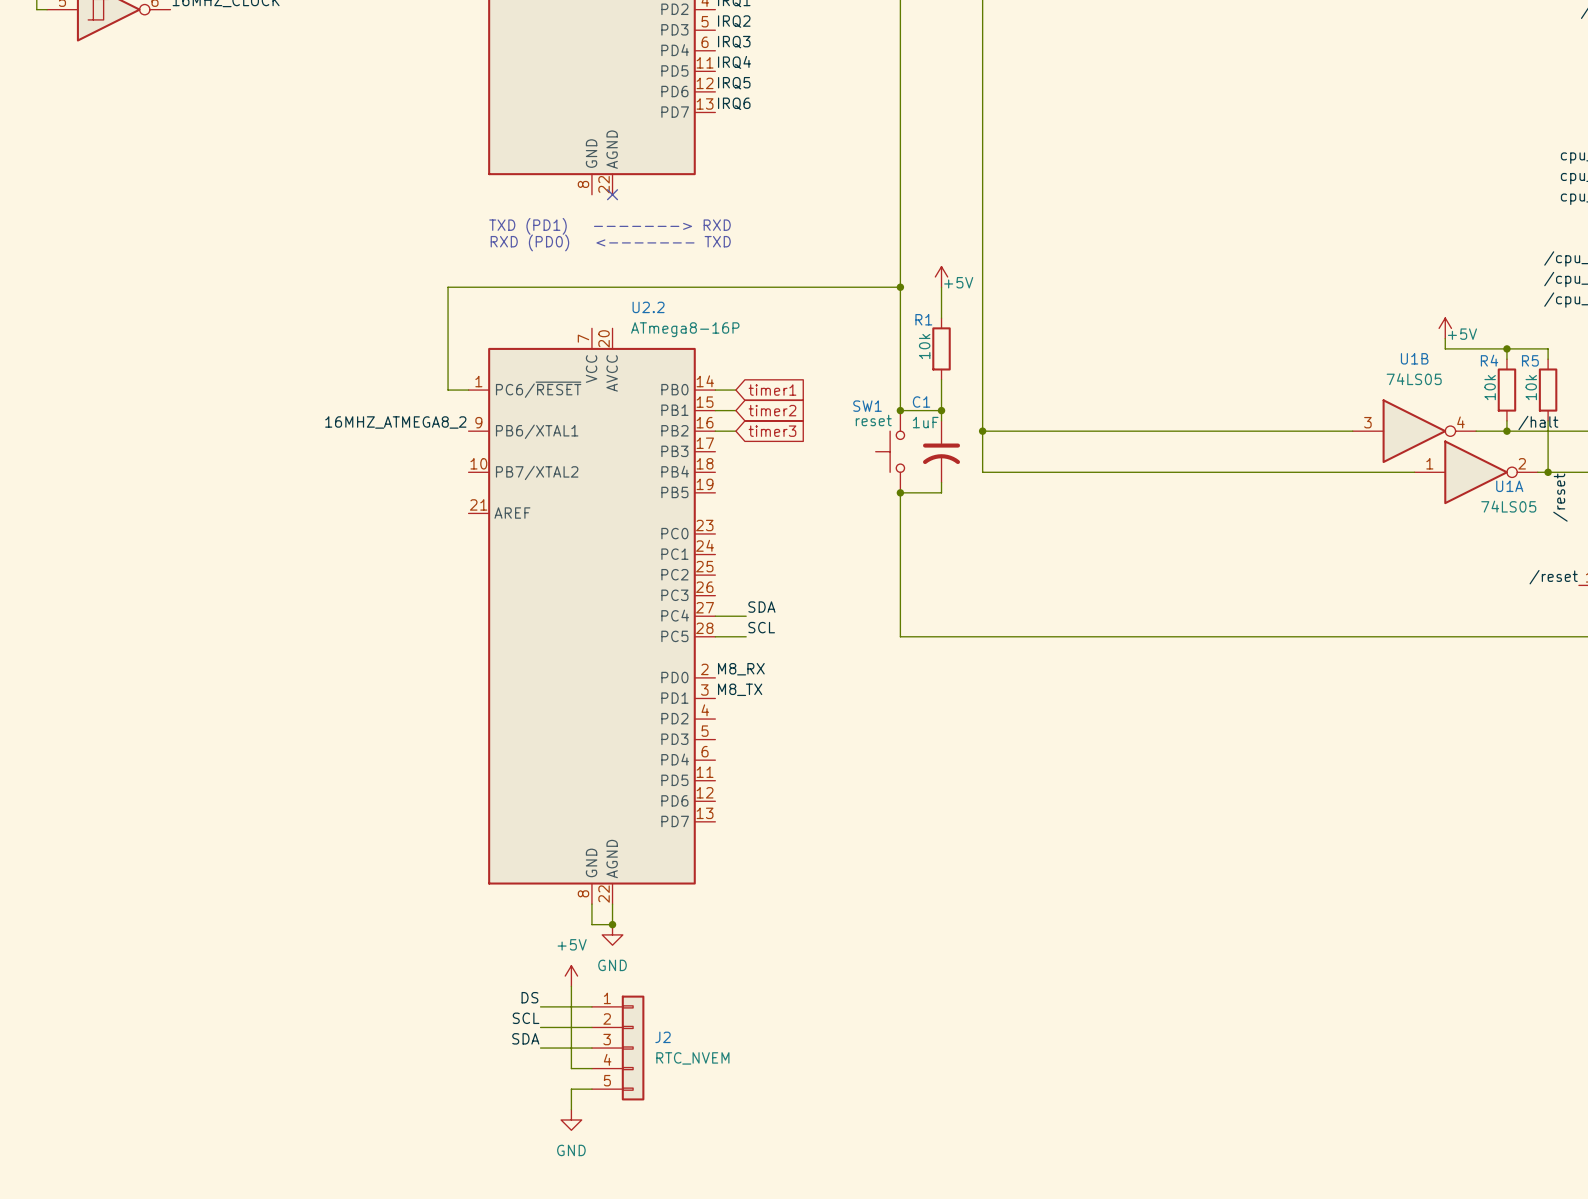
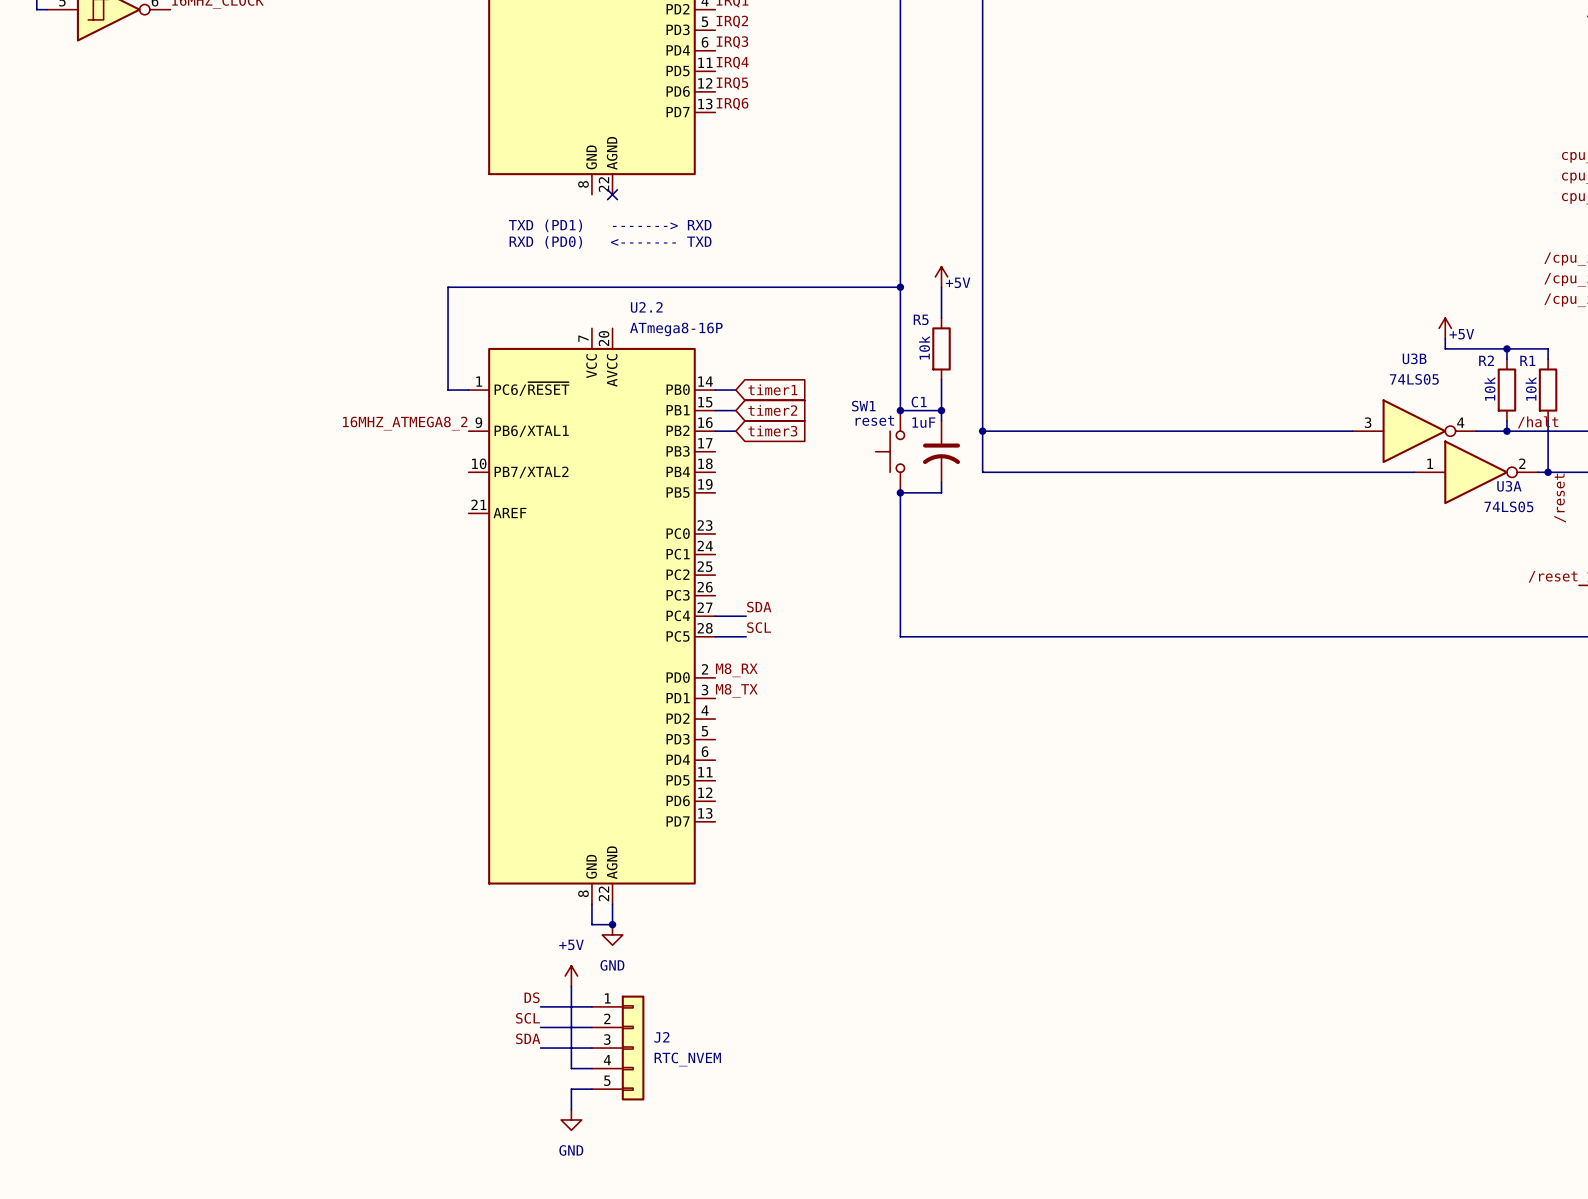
R1 name: R1 (923, 319) -> R5 (921, 319)
U1B name: U1B (1414, 358) -> U3B (1414, 358)
R4 name: R4 (1489, 360) -> R2 (1486, 360)
R5 name: R5 (1530, 360) -> R1 (1527, 360)
U1A name: U1A (1509, 486) -> U3A (1509, 486)

